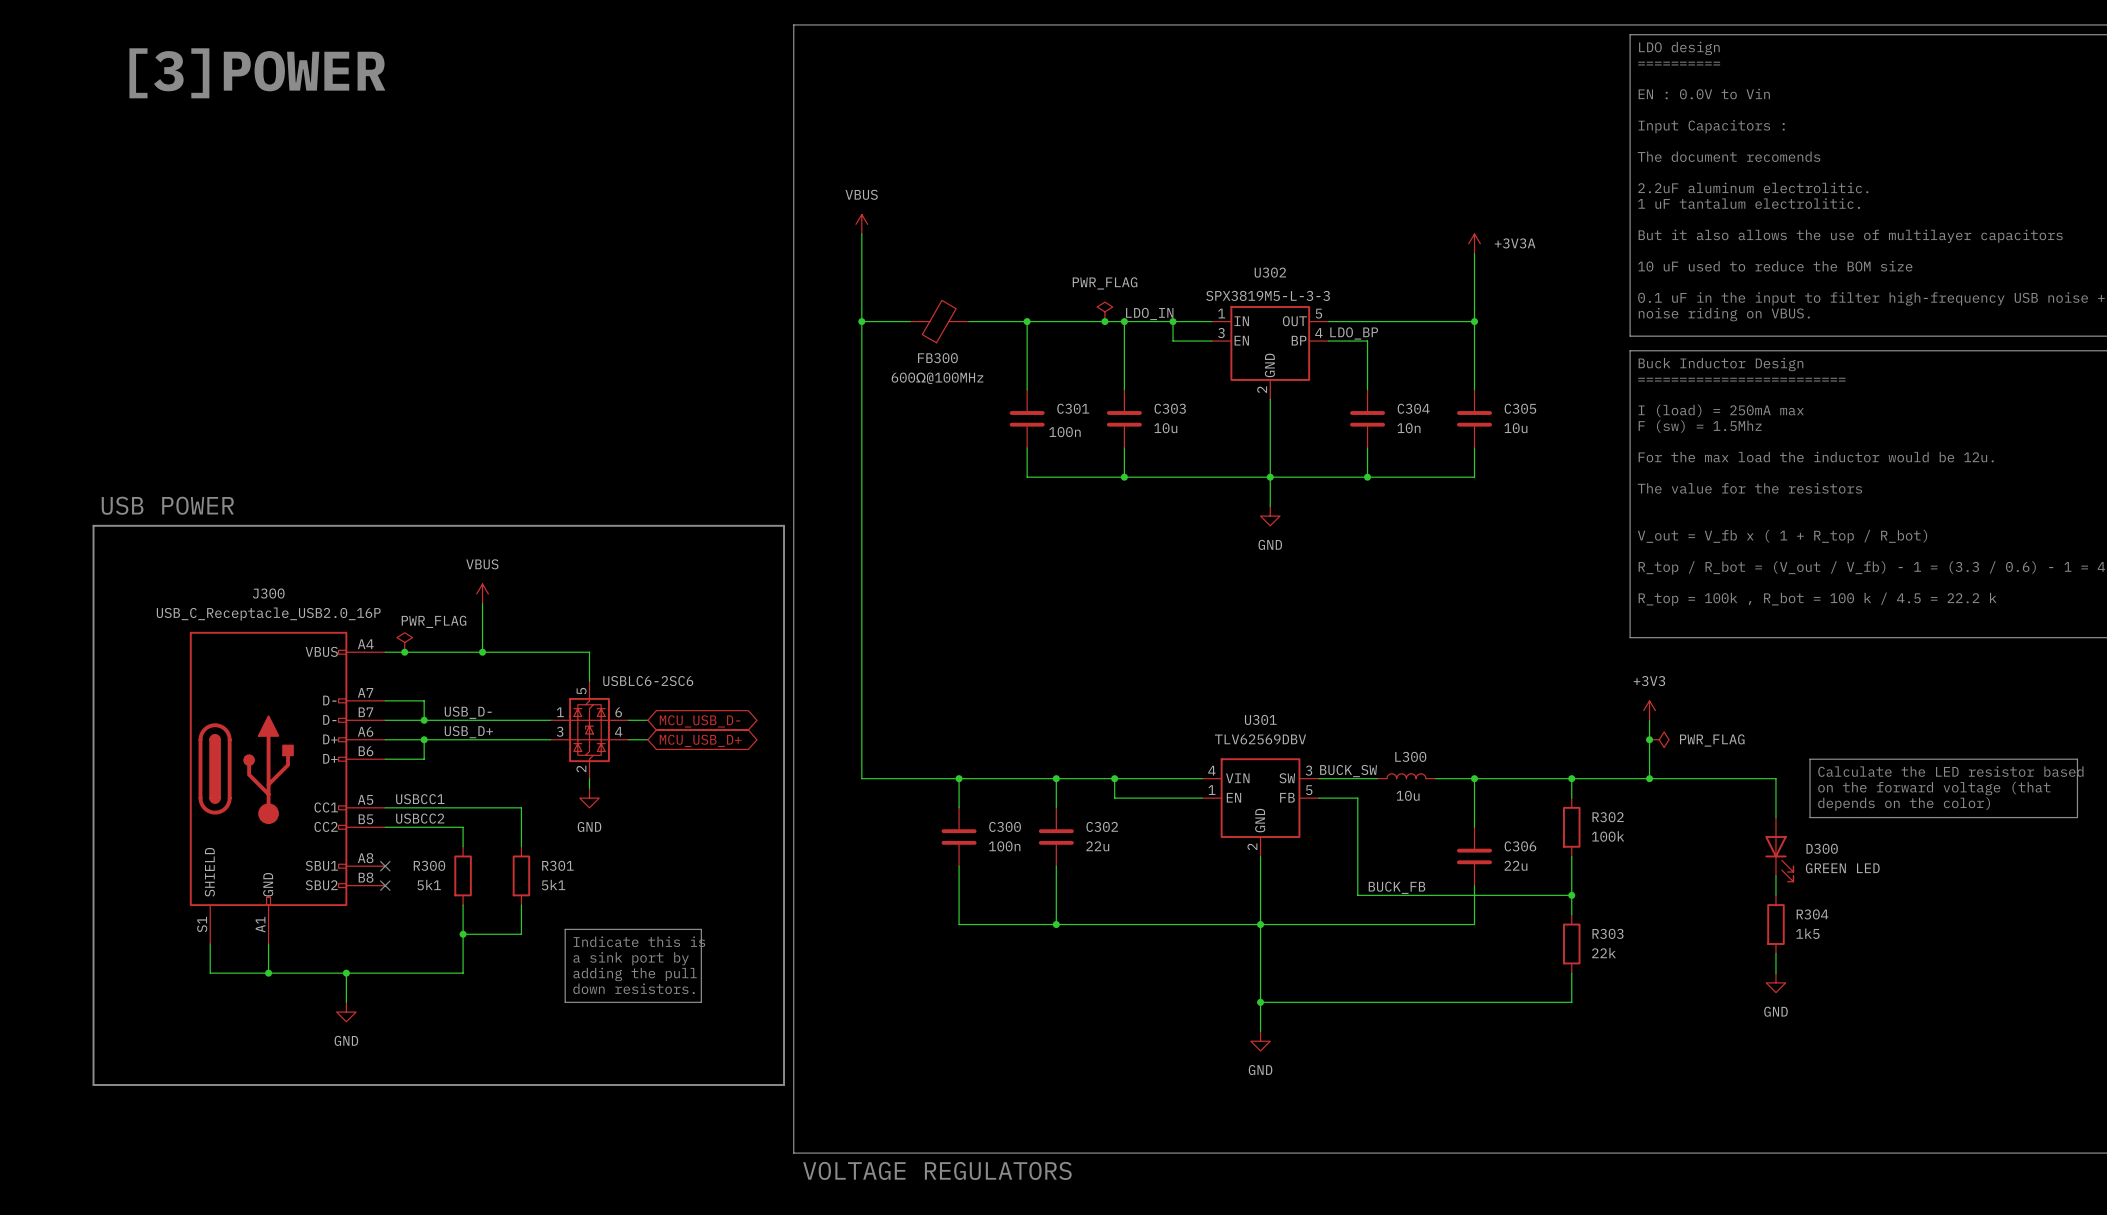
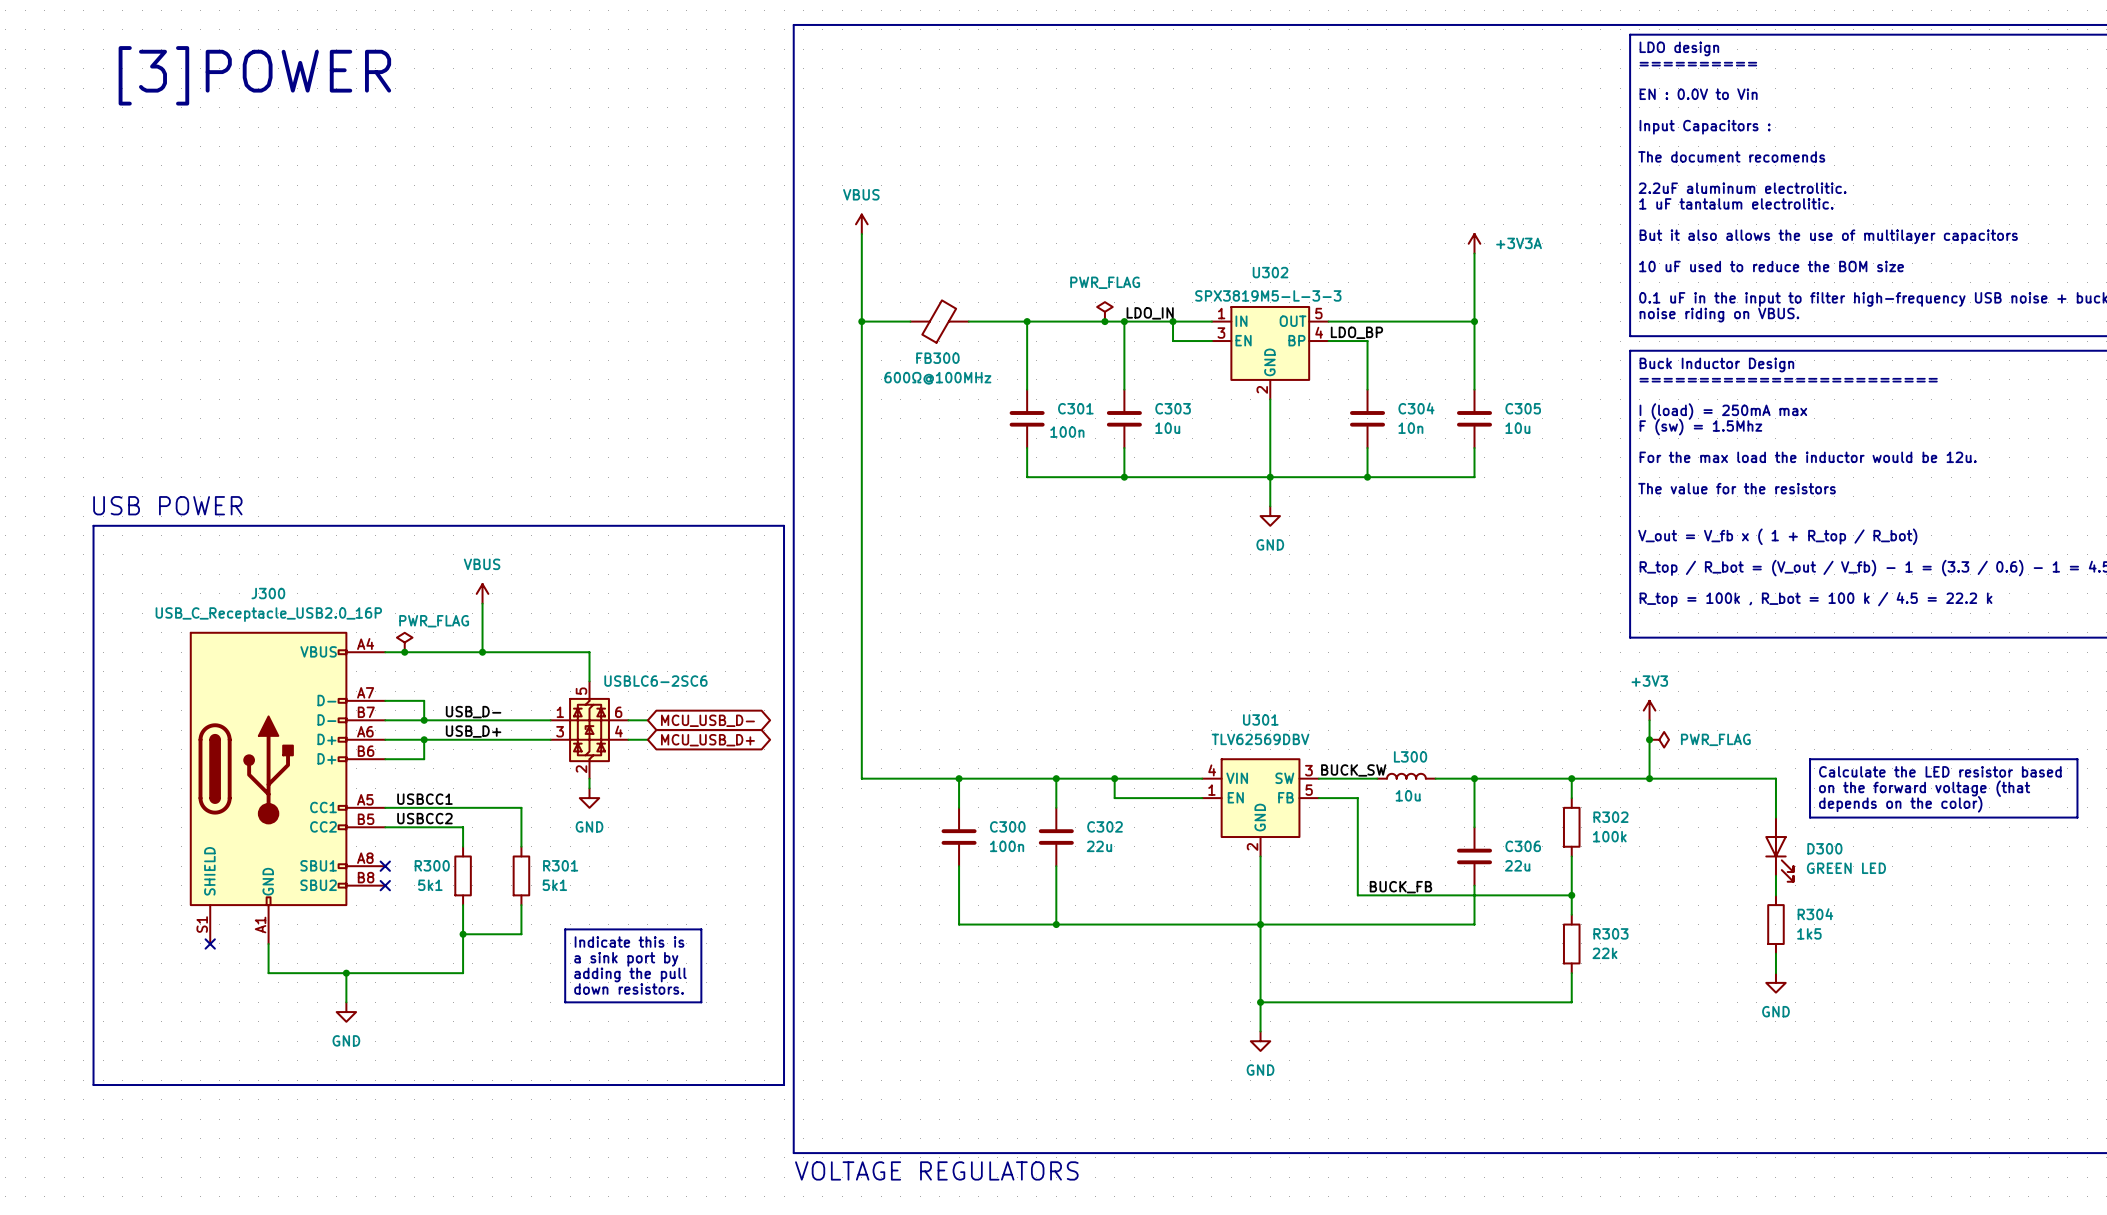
wire: (210, 943) (210, 973) (268, 973) -> none
no-connect mark: none -> (210, 943)
junction: (268, 973) -> none

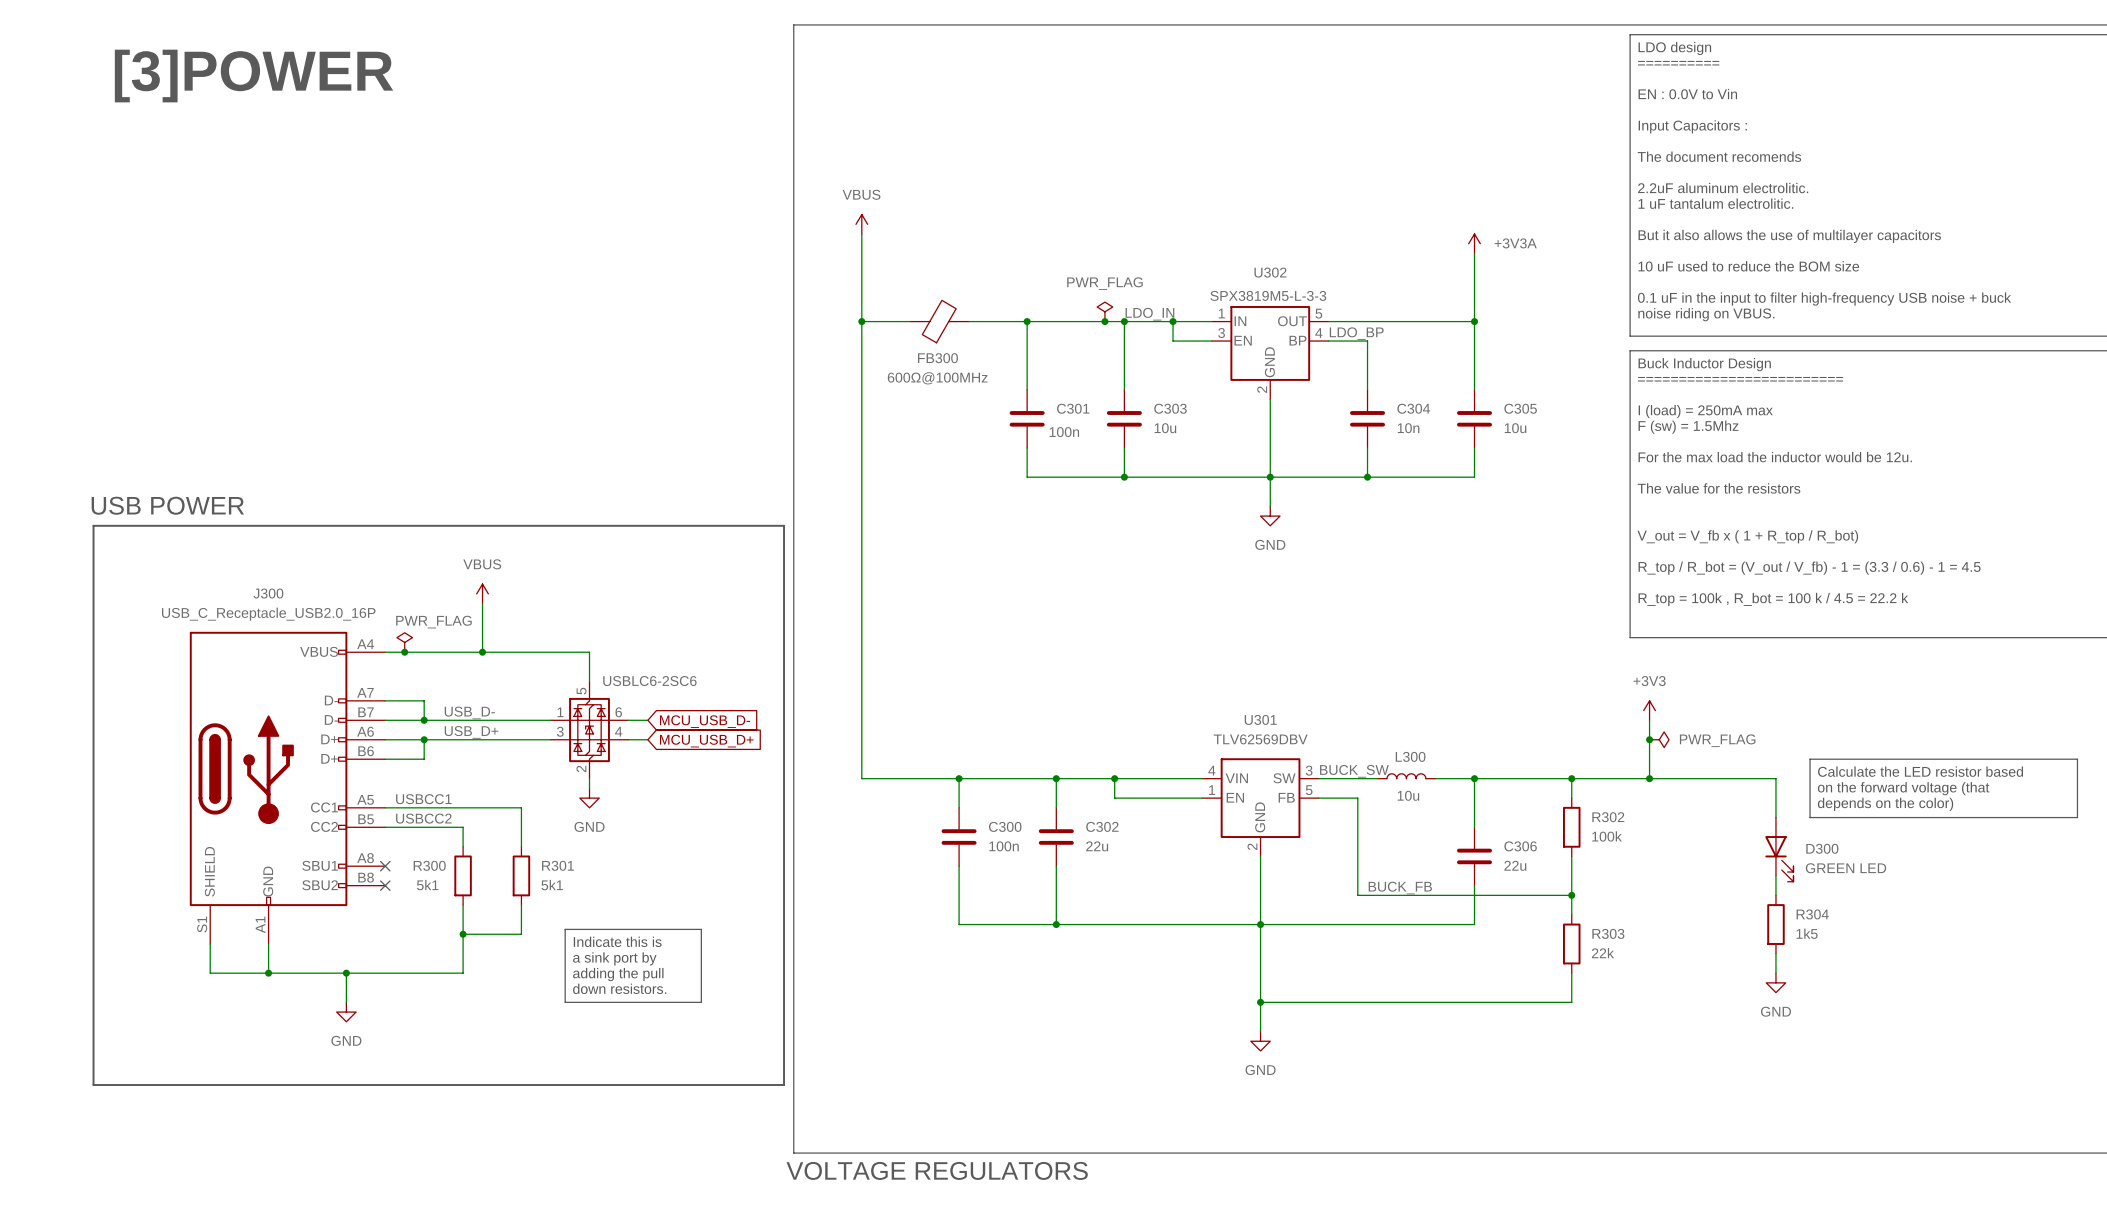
global label shape: bidirectional (707, 720) -> input (705, 721)
global label shape: bidirectional (707, 740) -> input (706, 741)
wire: none -> (210, 943) (210, 973) (268, 973)
no-connect mark: (210, 943) -> none
junction: none -> (268, 973)

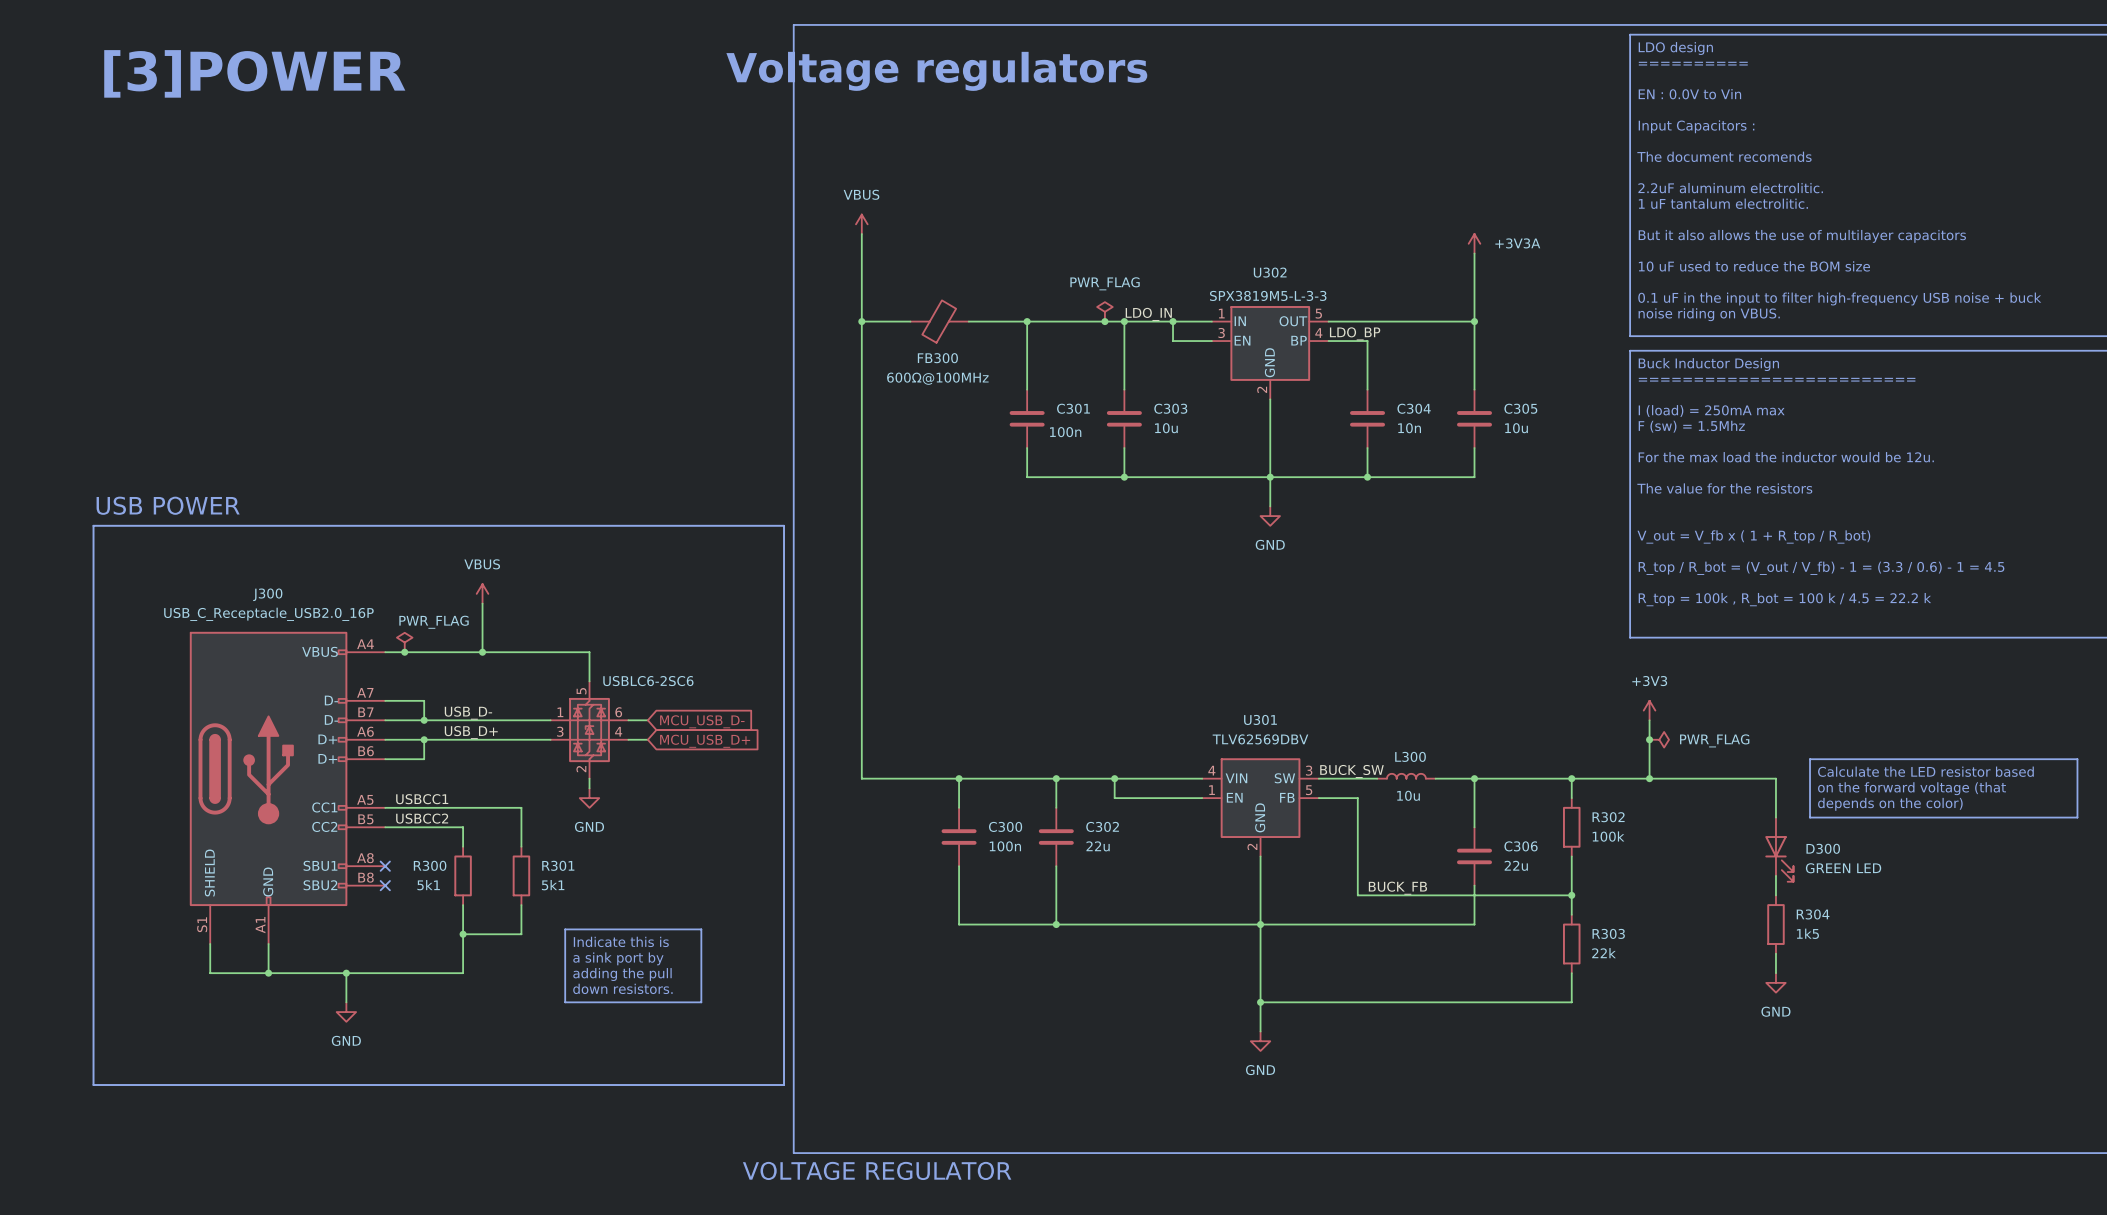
text: none -> Voltage regulators (936, 71)
text: VOLTAGE REGULATORS (937, 1170) -> VOLTAGE REGULATOR (877, 1170)

